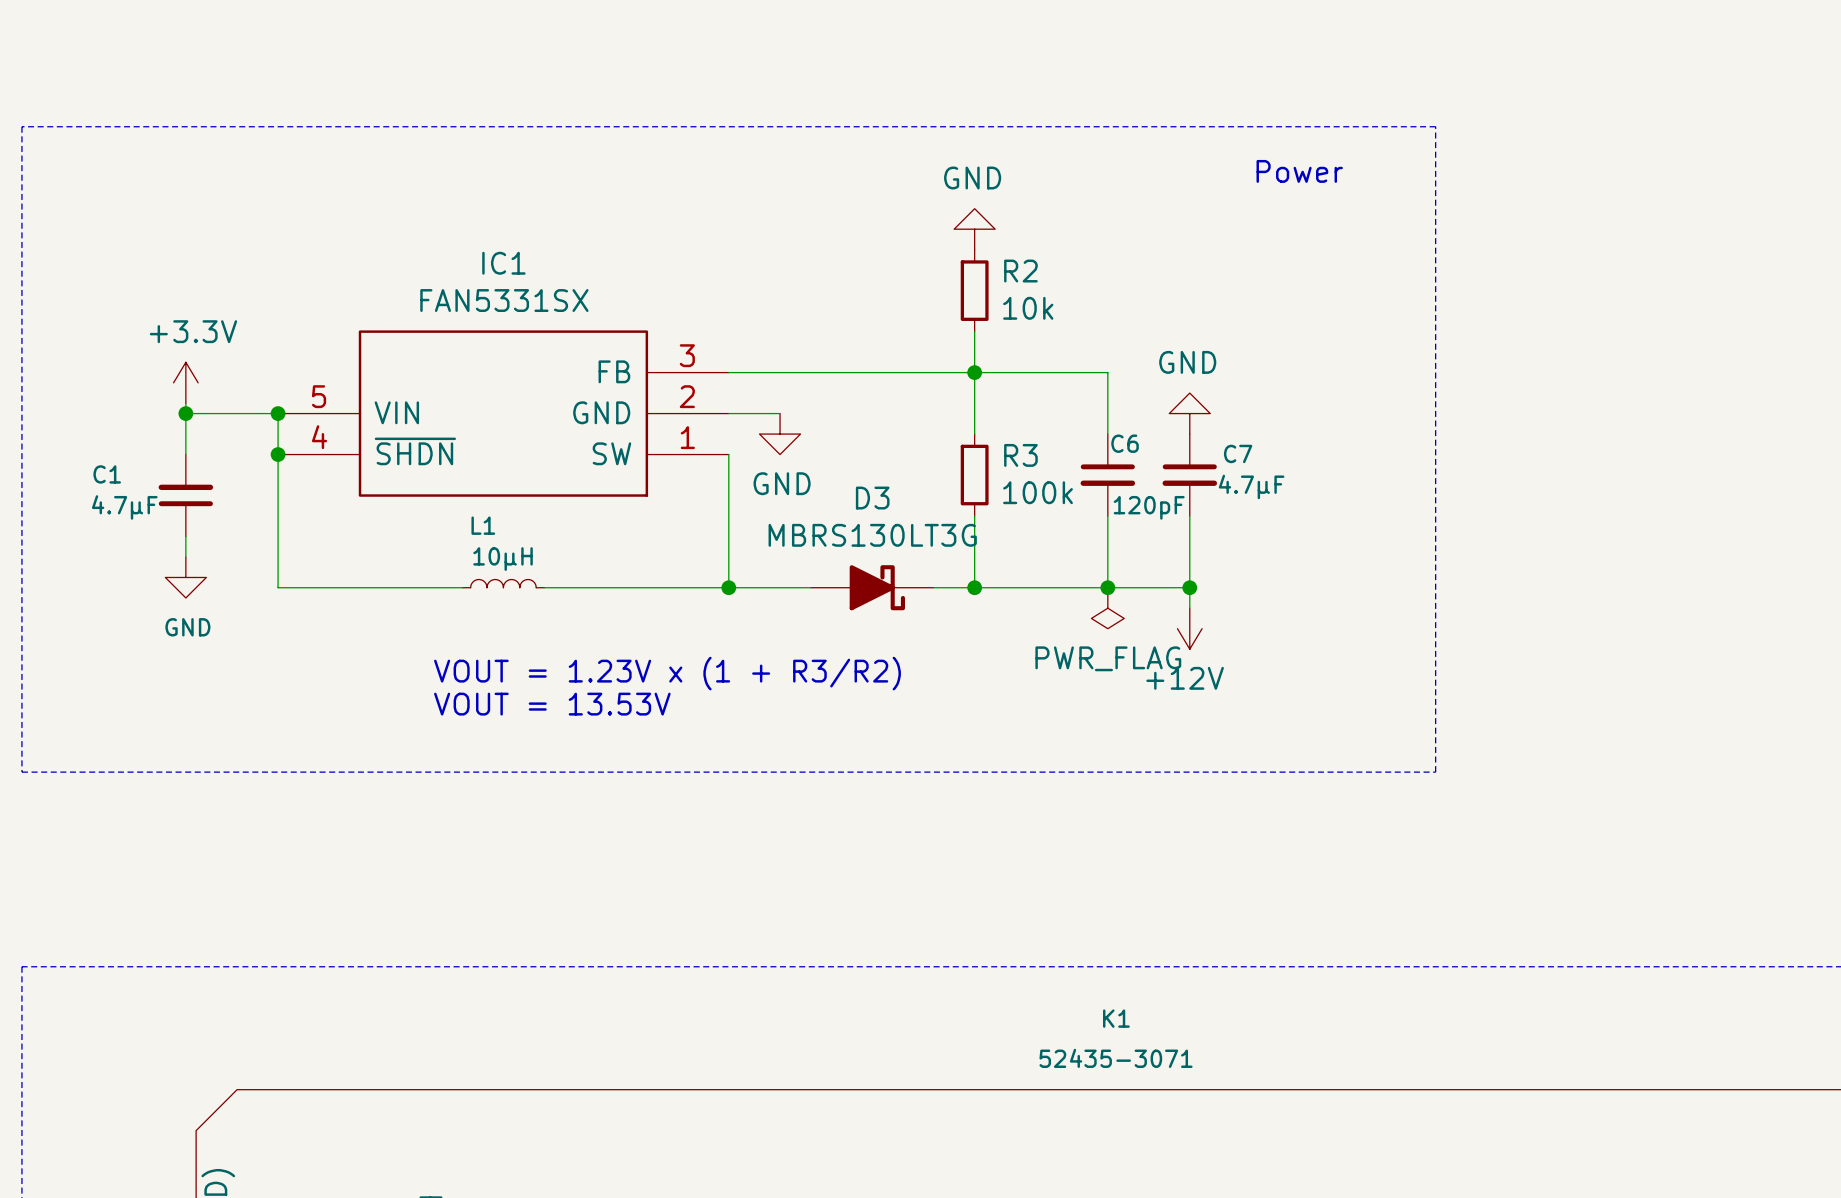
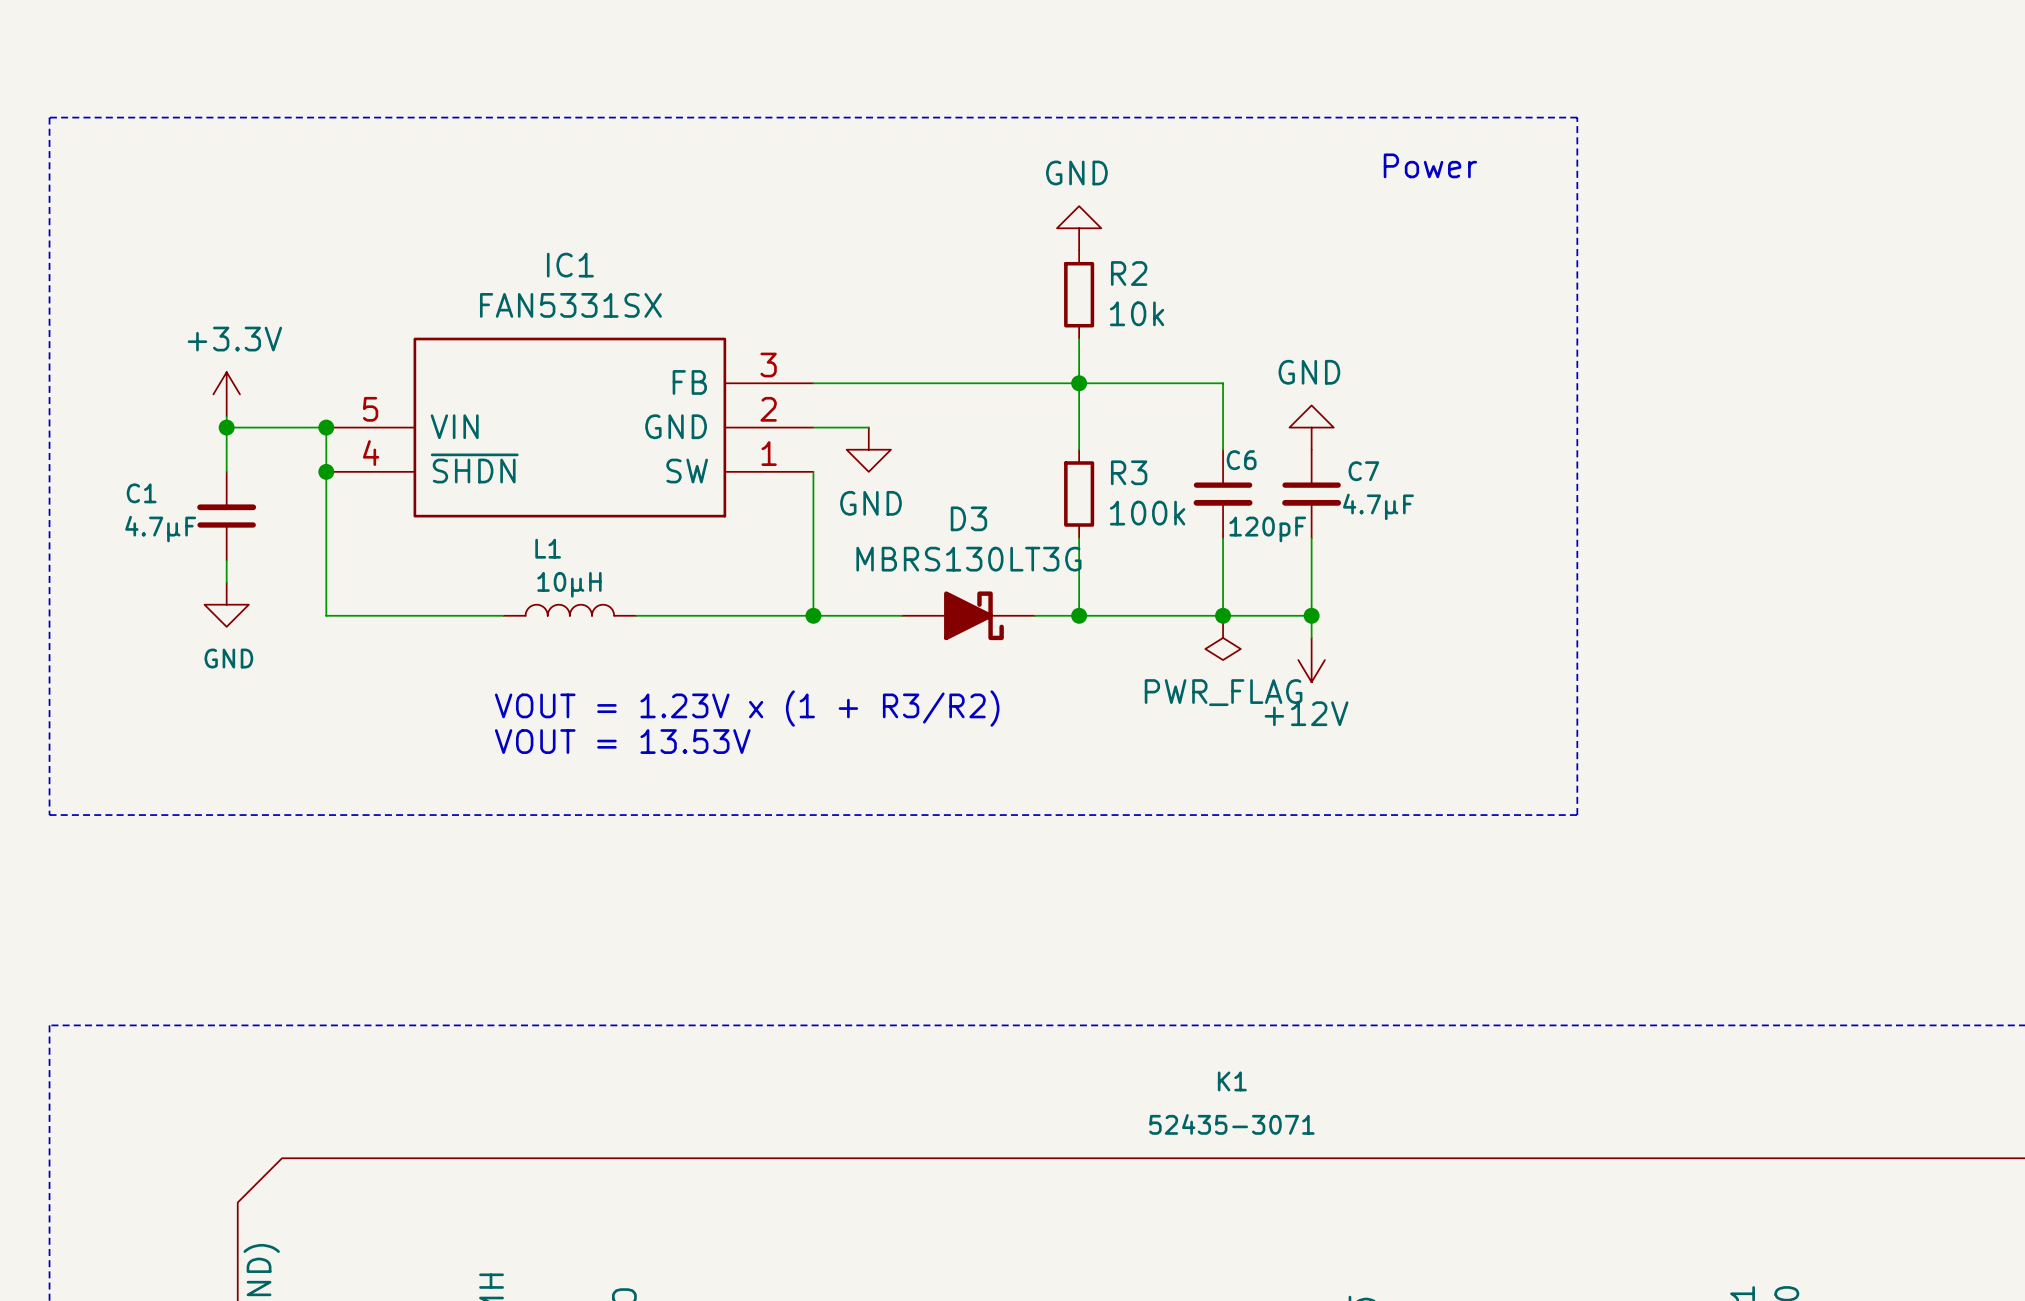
L1 symbol: [462, 579, 545, 588] -> [503, 604, 637, 616]

